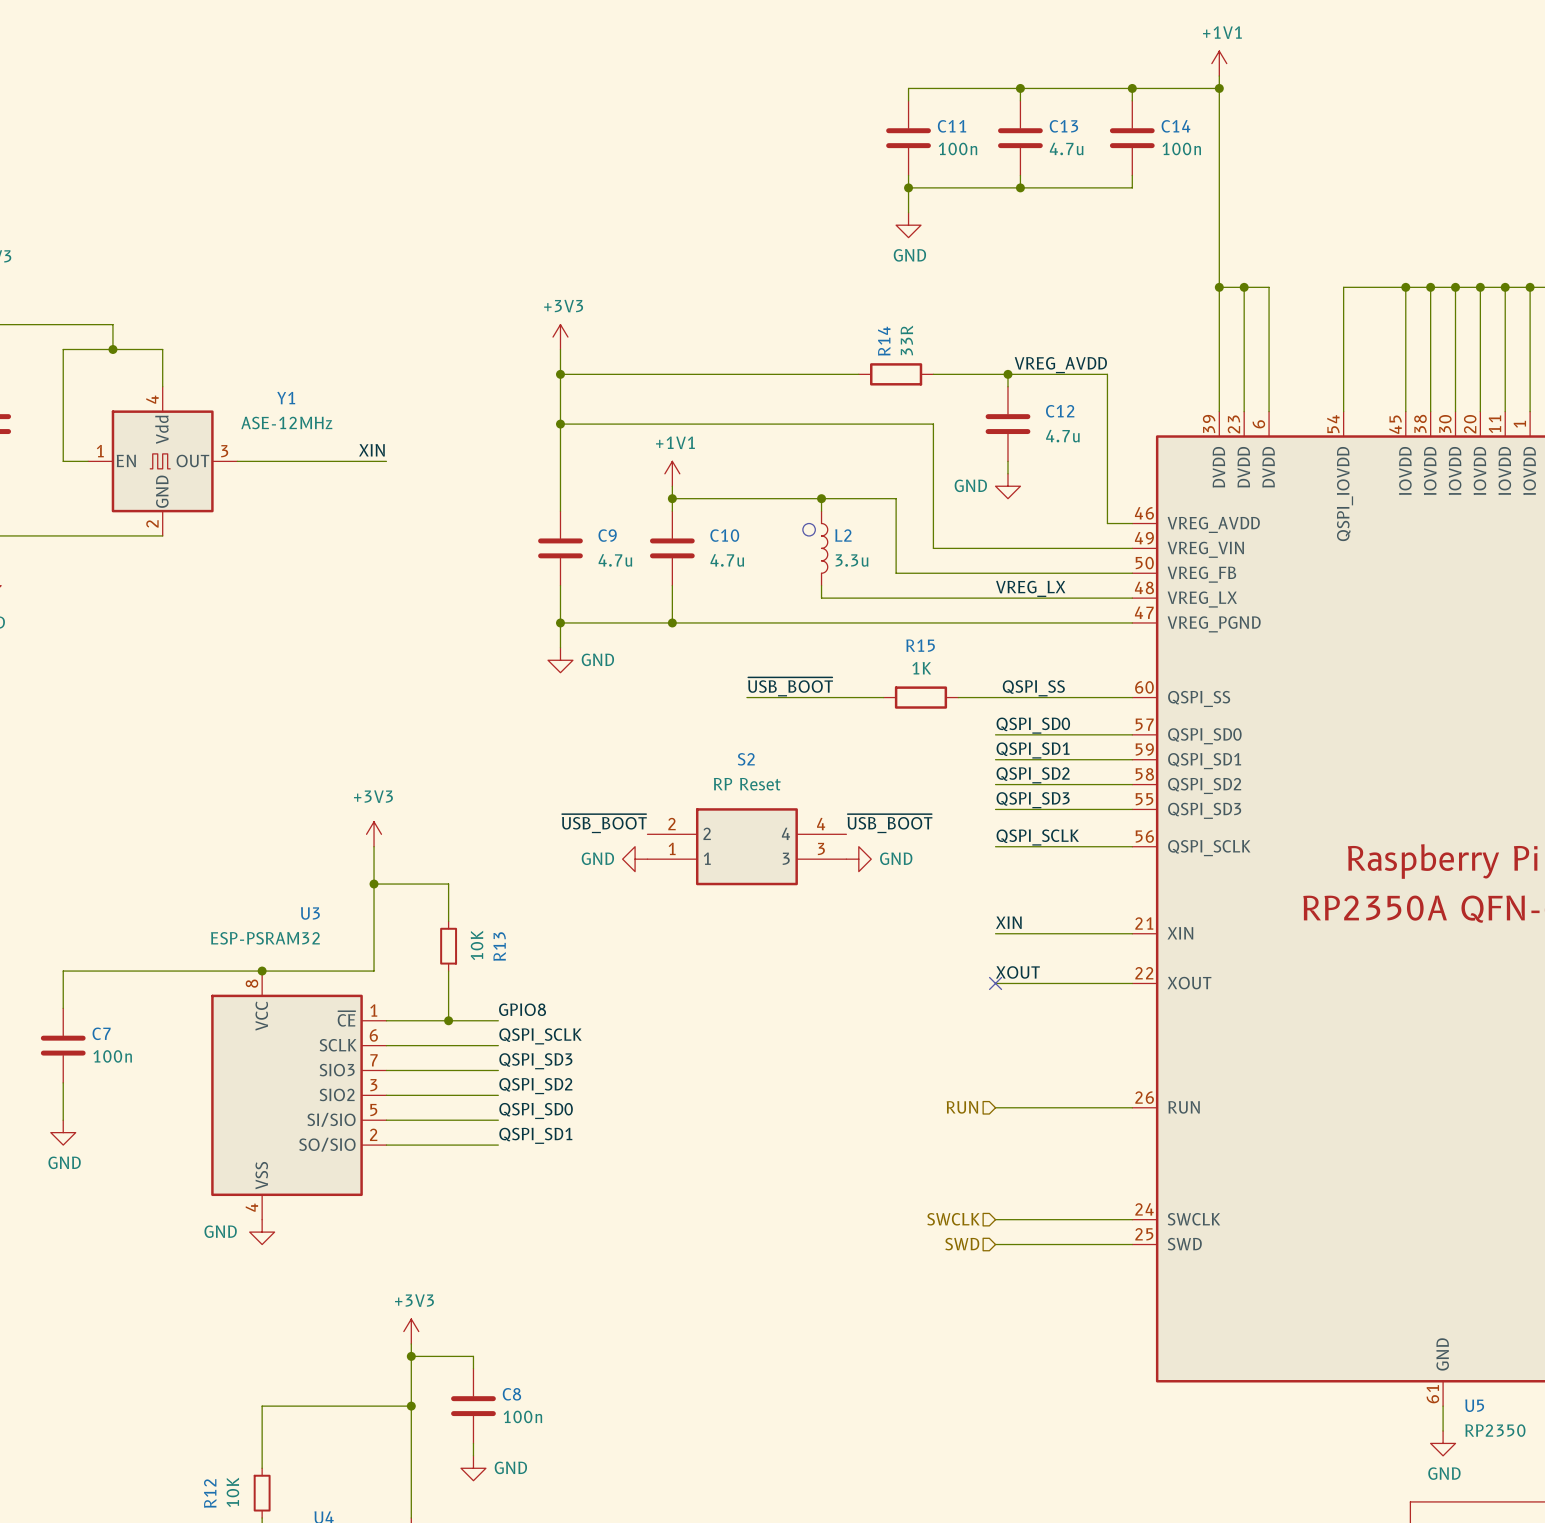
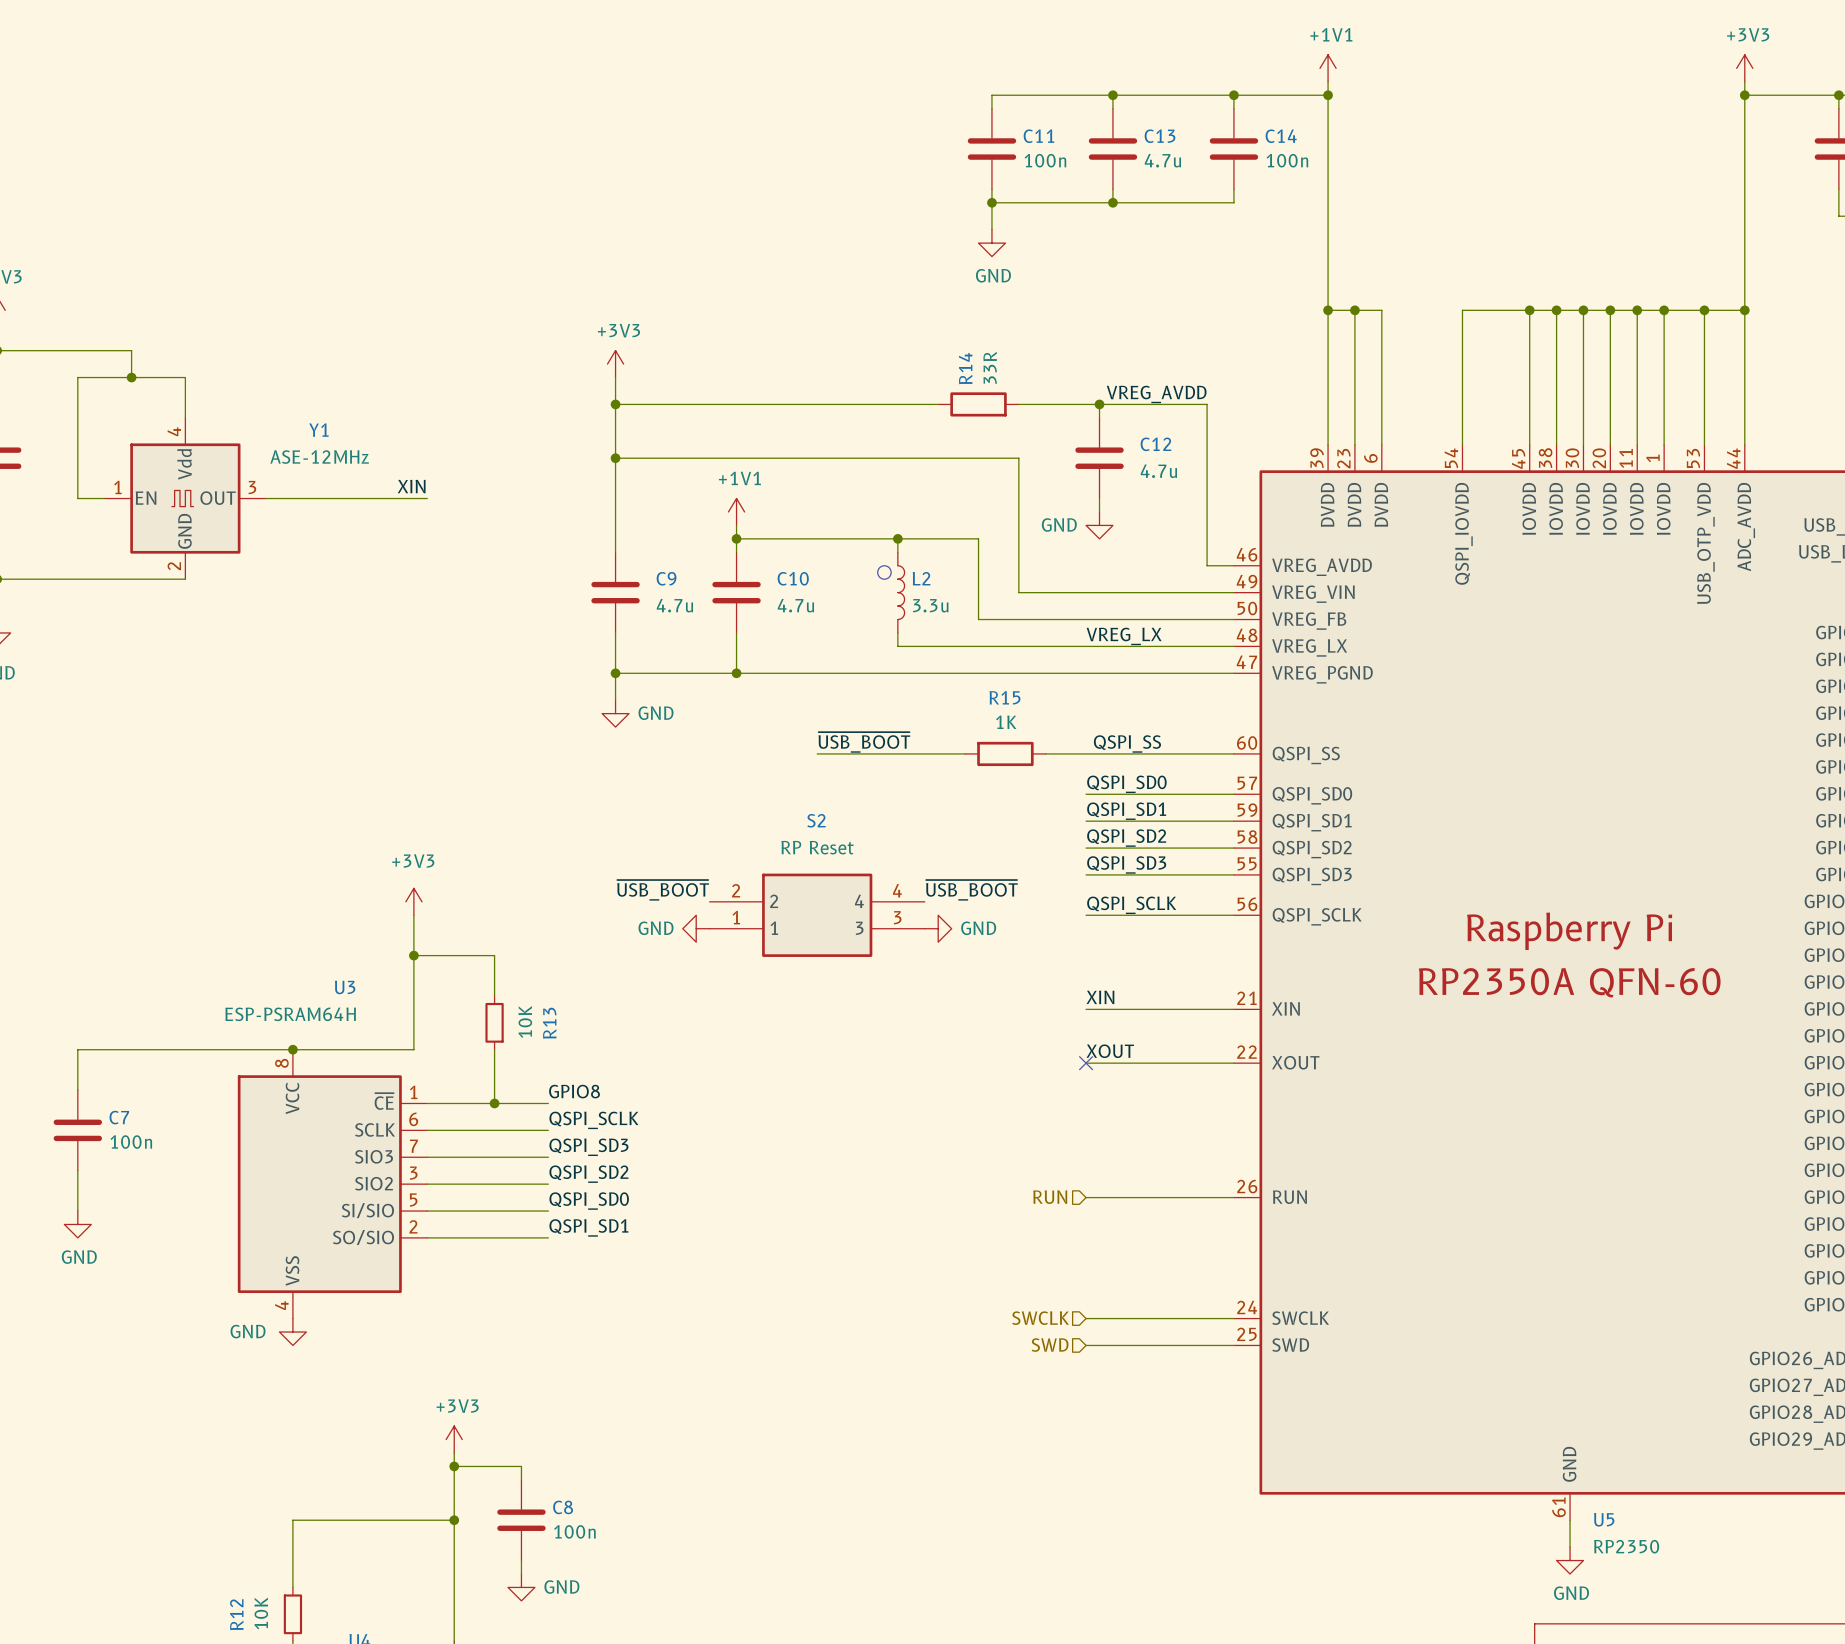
U3 value: ESP-PSRAM32 (265, 938) -> ESP-PSRAM64H (290, 1014)

